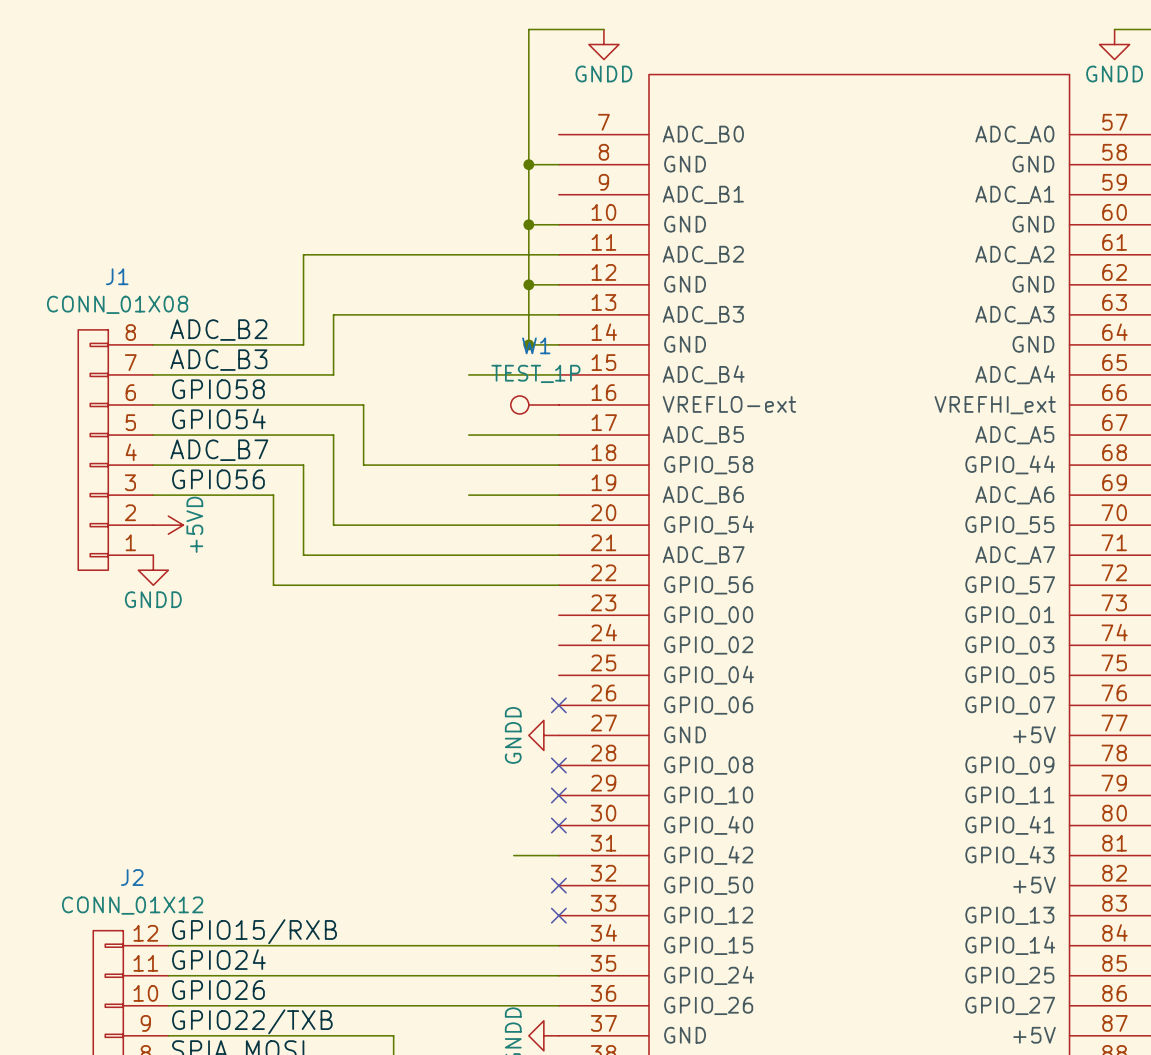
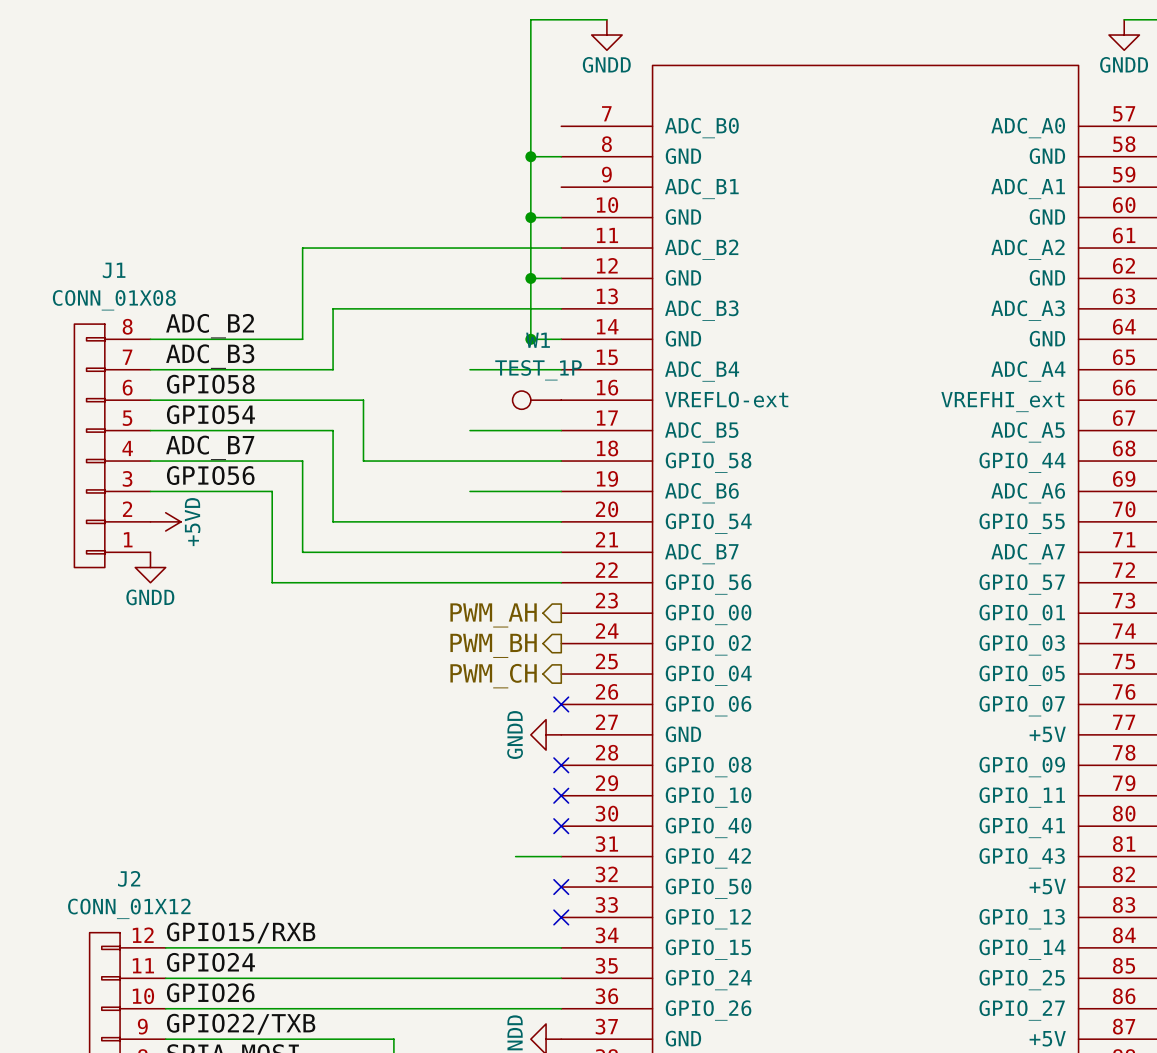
hierarchical label: none -> PWM_AH (493, 615)
hierarchical label: none -> PWM_BH (493, 645)
hierarchical label: none -> PWM_CH (493, 676)

